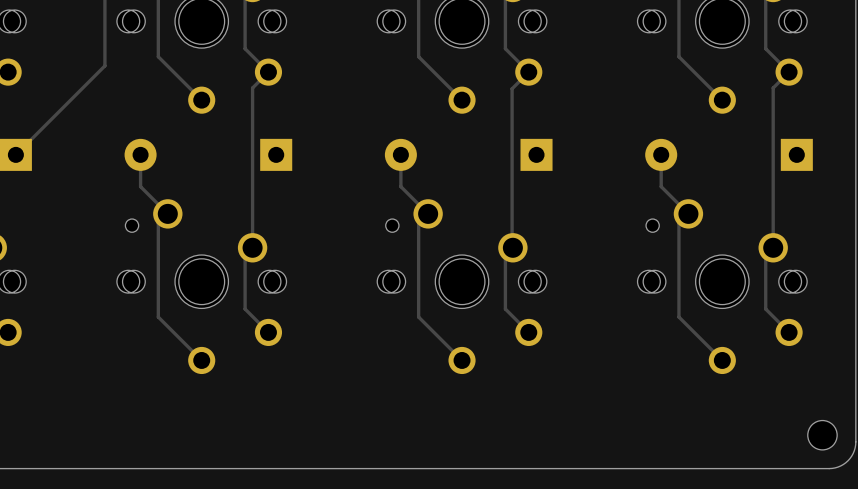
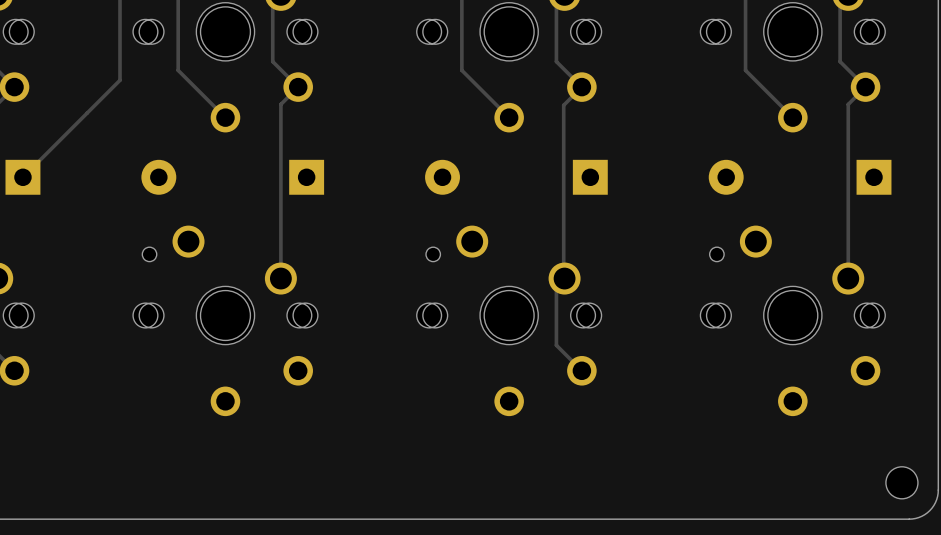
track: (140, 154) (140, 186) (167, 213) (158, 223) (158, 317) (201, 360) -> none
track: (400, 154) (400, 186) (428, 213) (418, 223) (418, 317) (462, 360) -> none
track: (661, 154) (661, 186) (688, 213) (678, 223) (678, 317) (722, 360) -> none
track: (252, 247) (245, 255) (245, 309) (268, 332) -> none
track: (773, 247) (765, 255) (765, 309) (789, 332) -> none

